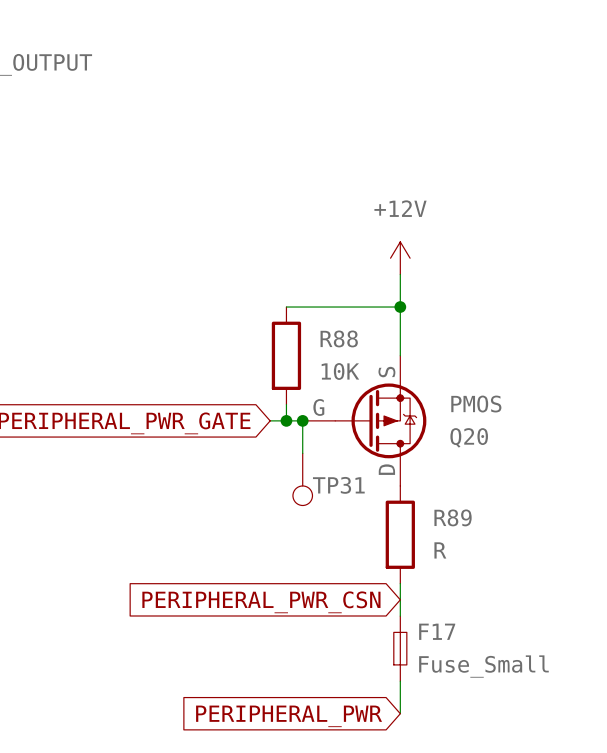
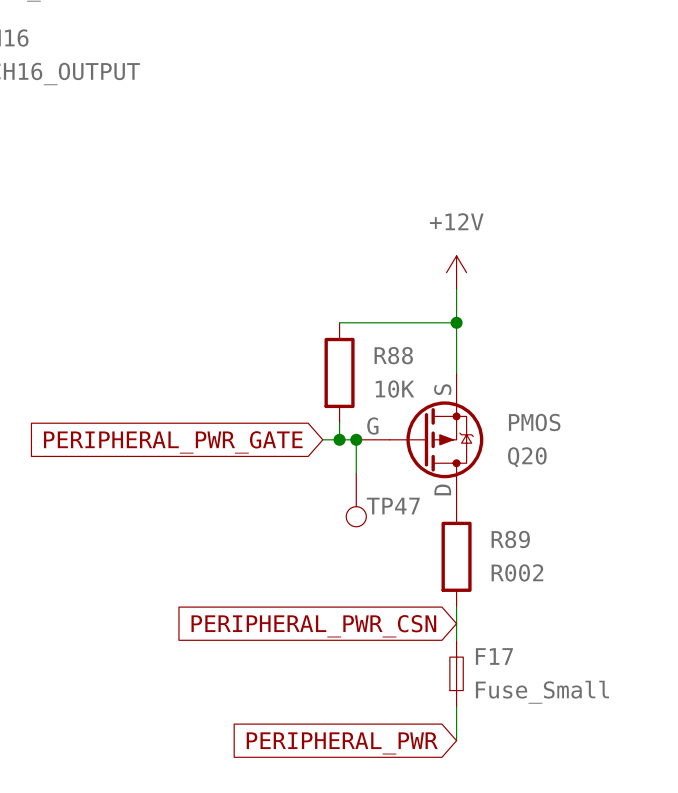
TP31 name: TP31 (338, 485) -> TP47 (393, 506)
R89 value: R (440, 550) -> R002 (517, 572)

